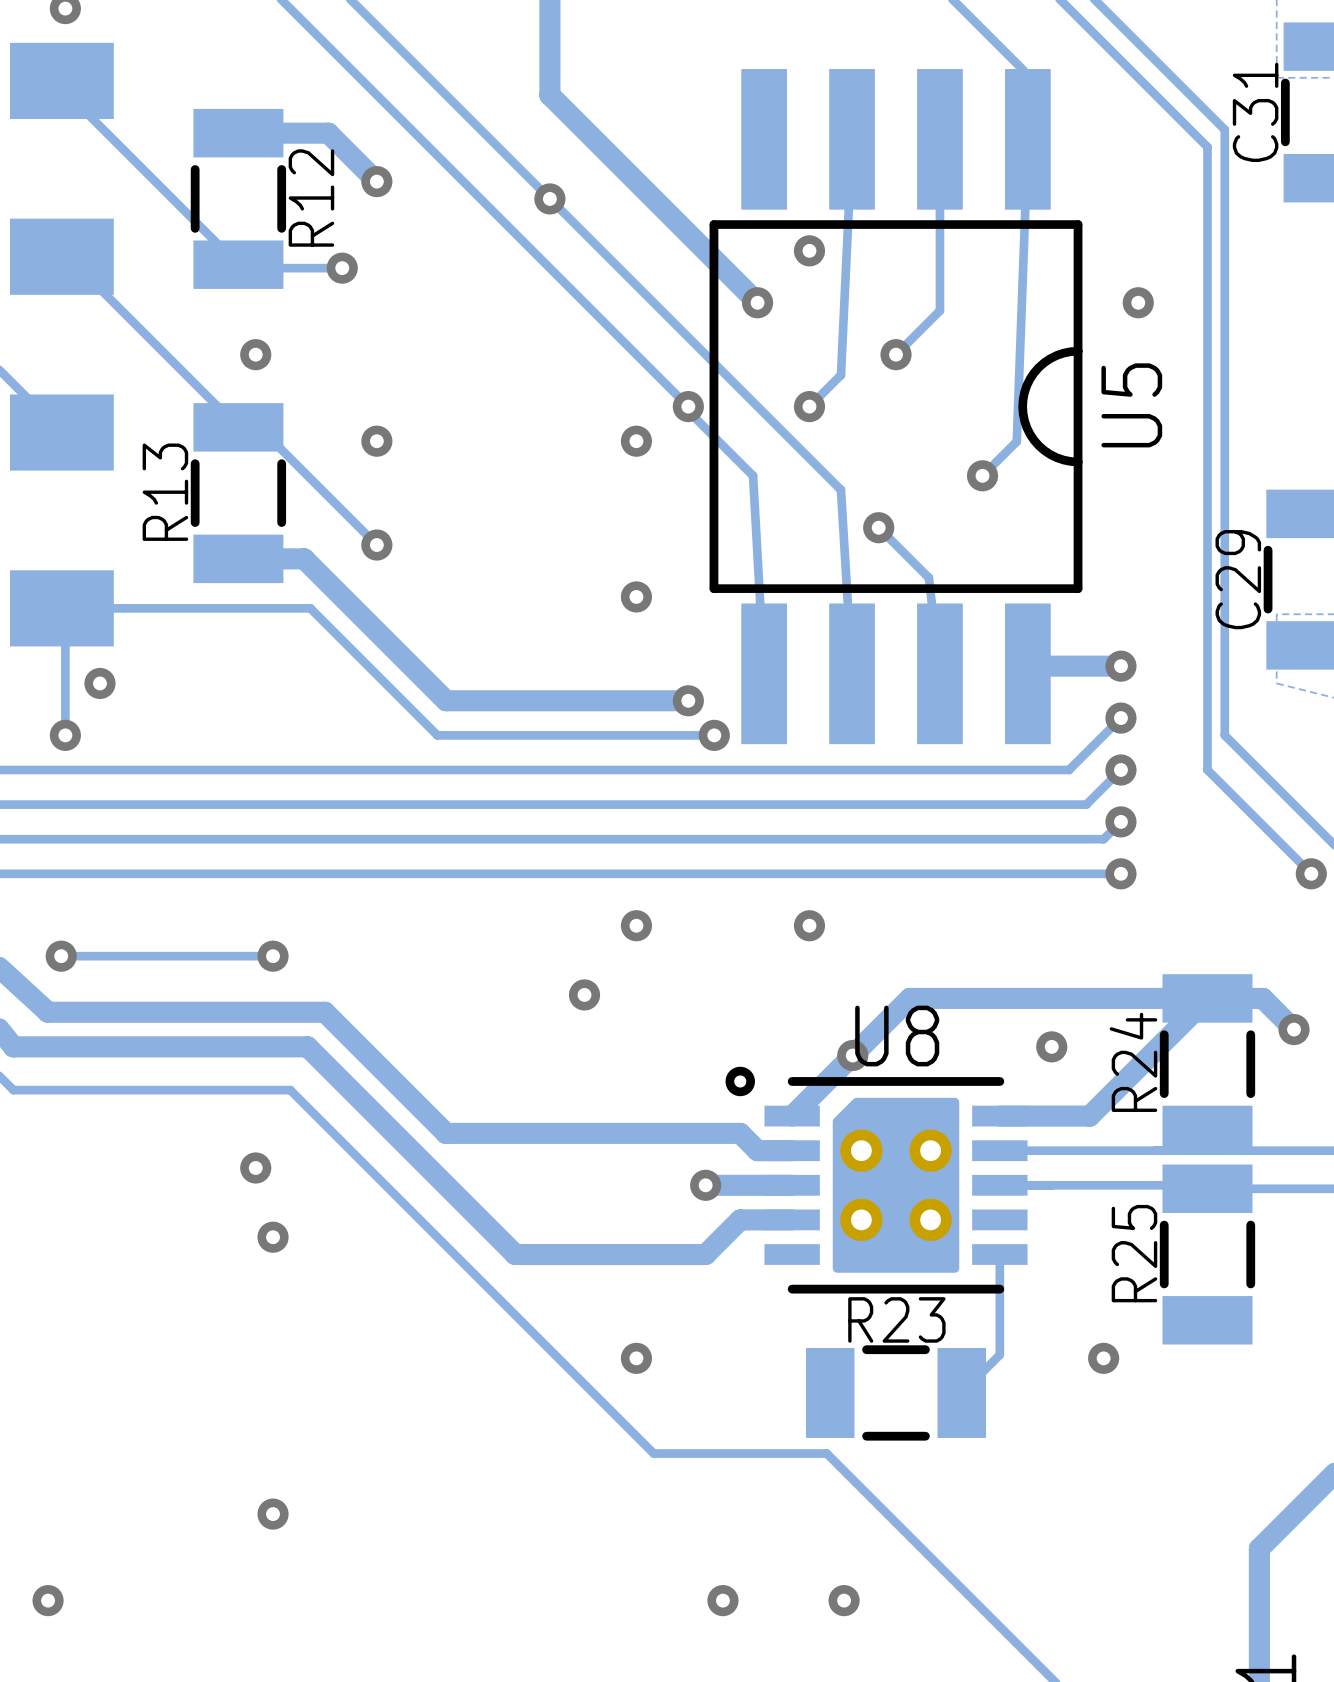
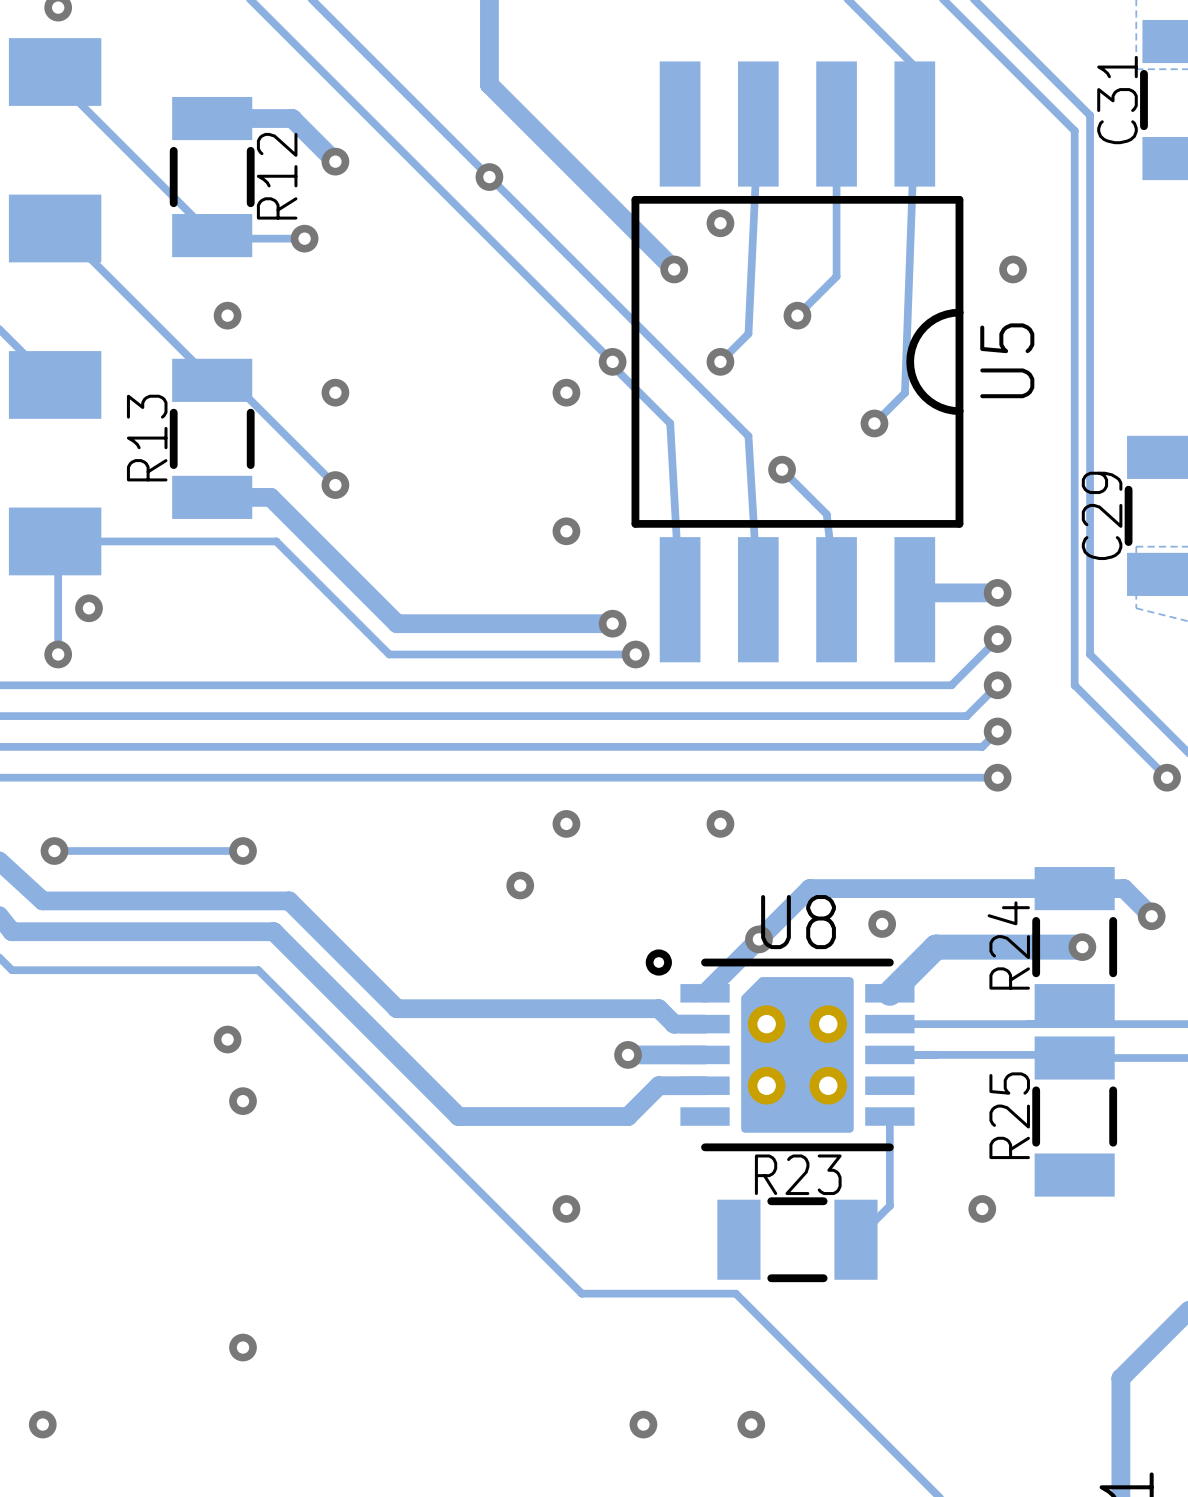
track: (1207, 998) (1089, 1116) (999, 1116) -> (1082, 947) (936, 947) (889, 993)
via position: (1051, 1046) -> (882, 924)
via: none -> (1082, 947)

